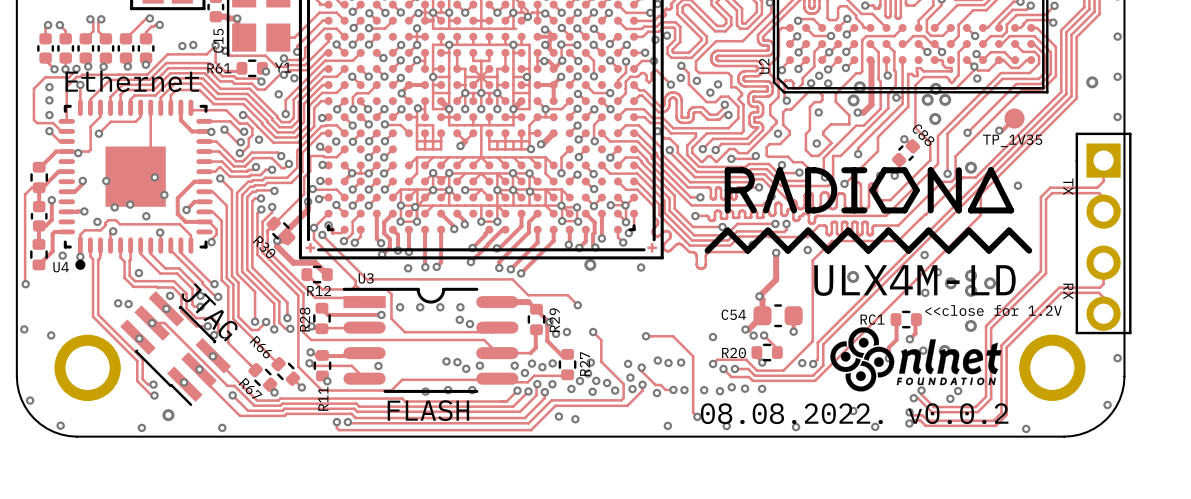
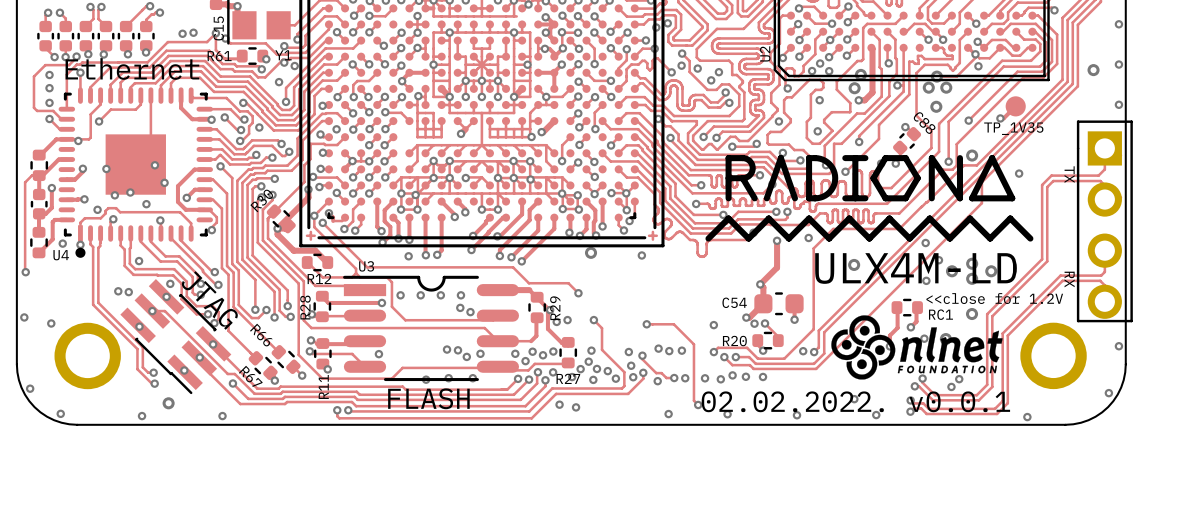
R30 name rotation: 0° (264, 246) -> 90° counterclockwise (261, 200)
RC1 name position: RC1 (872, 319) -> RC1 (940, 314)
R27 name rotation: 0° (584, 364) -> 90° clockwise (568, 378)
text: 08.08.2022. v0.0.2 (854, 413) -> 02.02.2022. v0.0.1 (855, 401)

